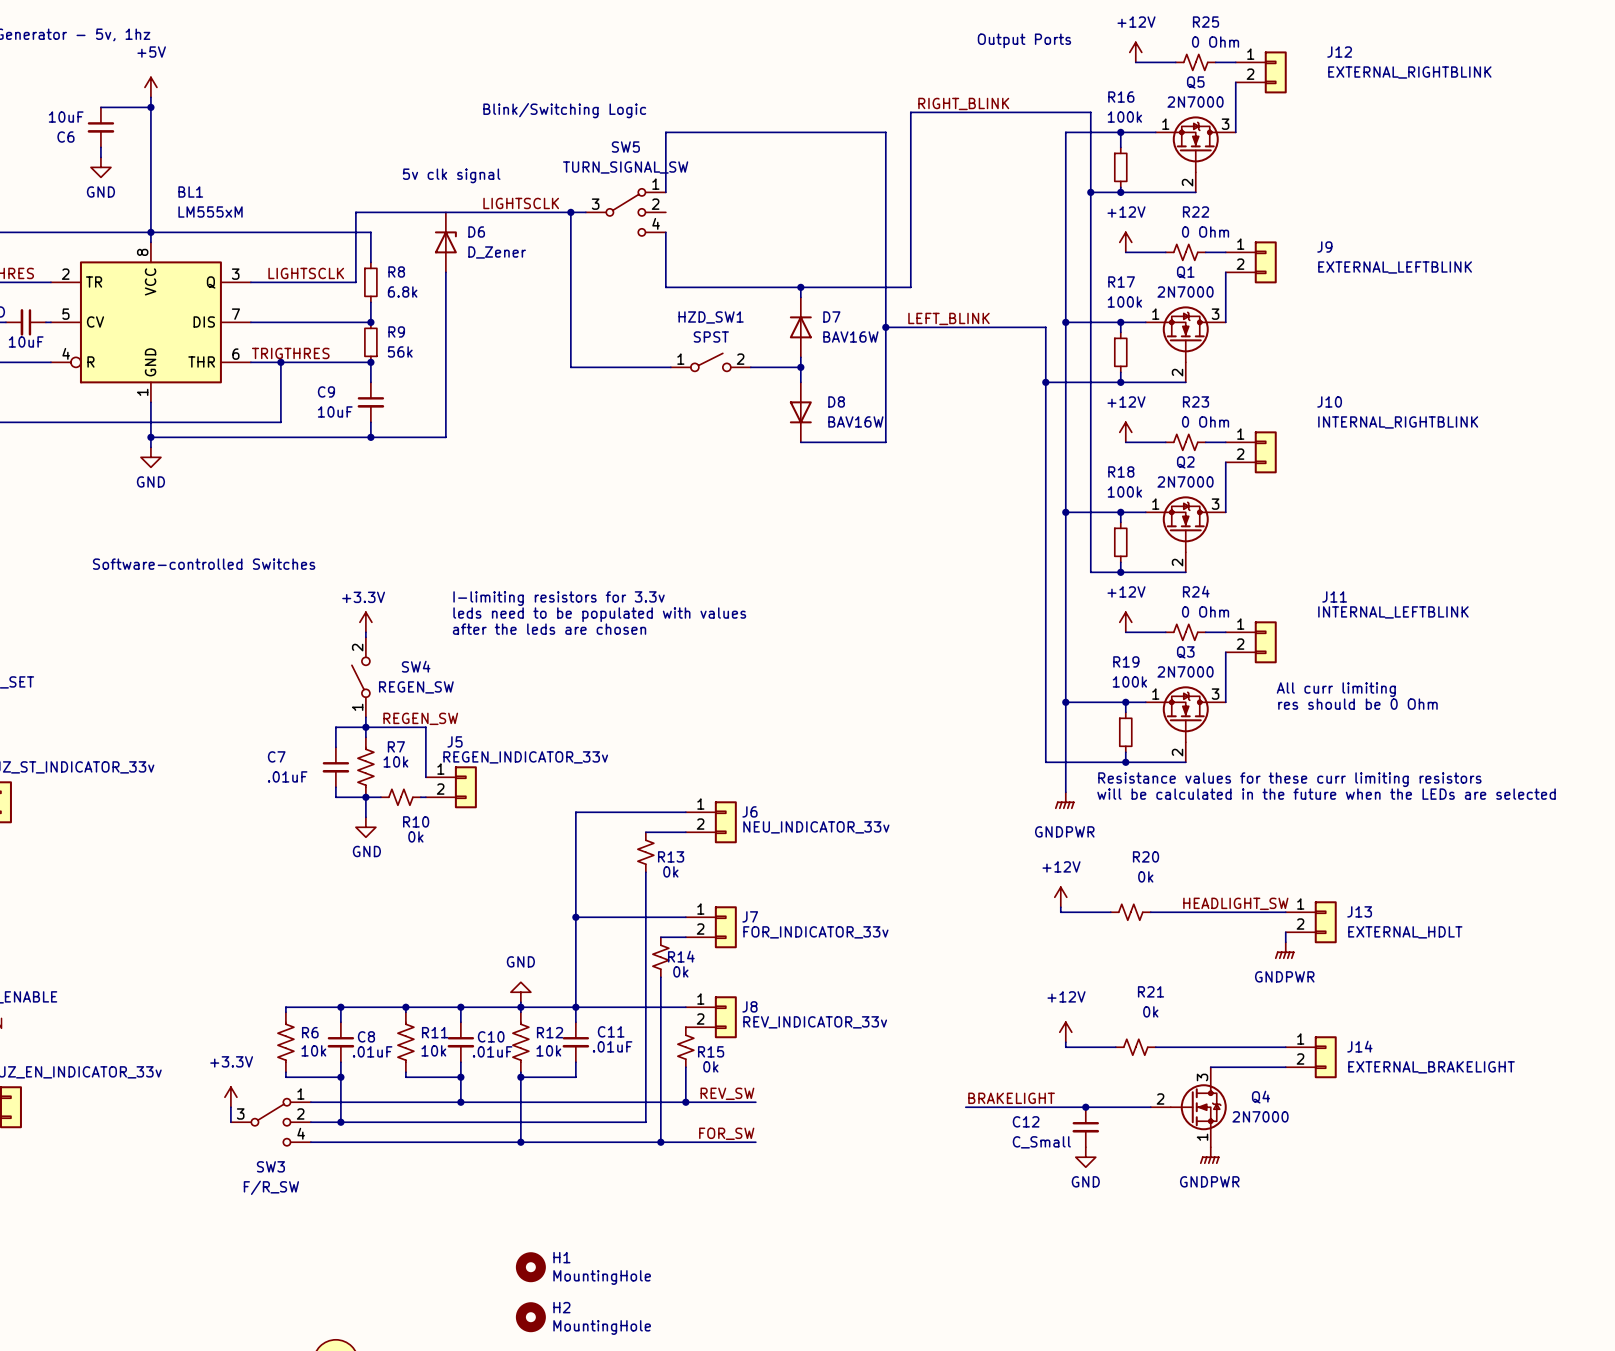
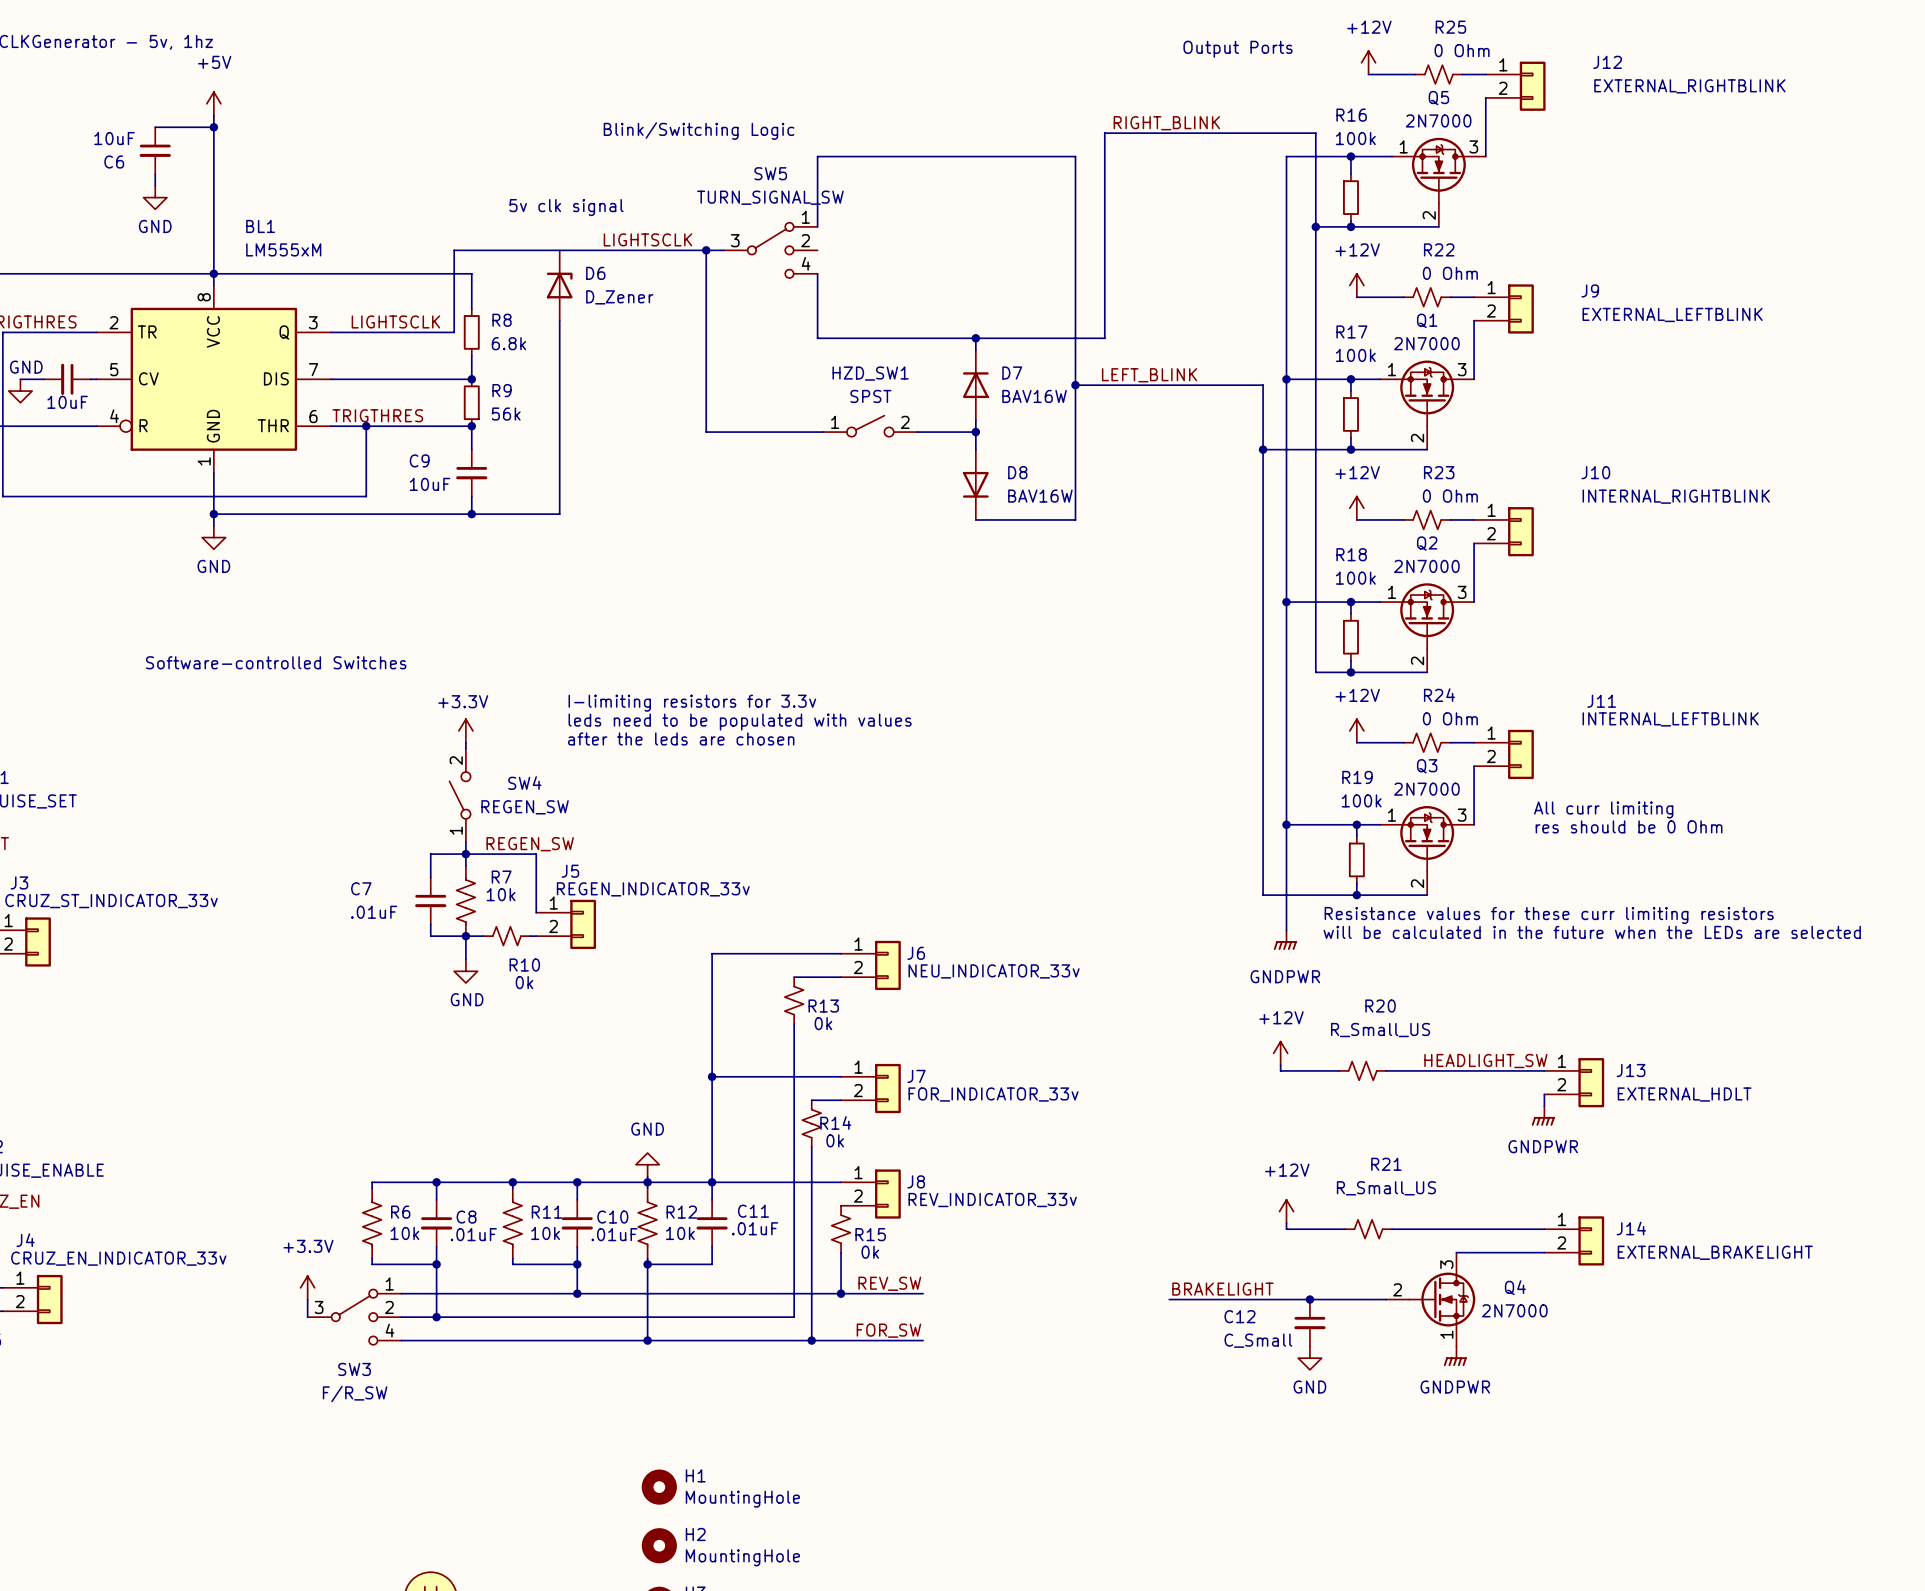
R20 value: 0k (1145, 876) -> R_Small_US (1380, 1030)
R21 value: 0k (1150, 1011) -> R_Small_US (1386, 1188)

